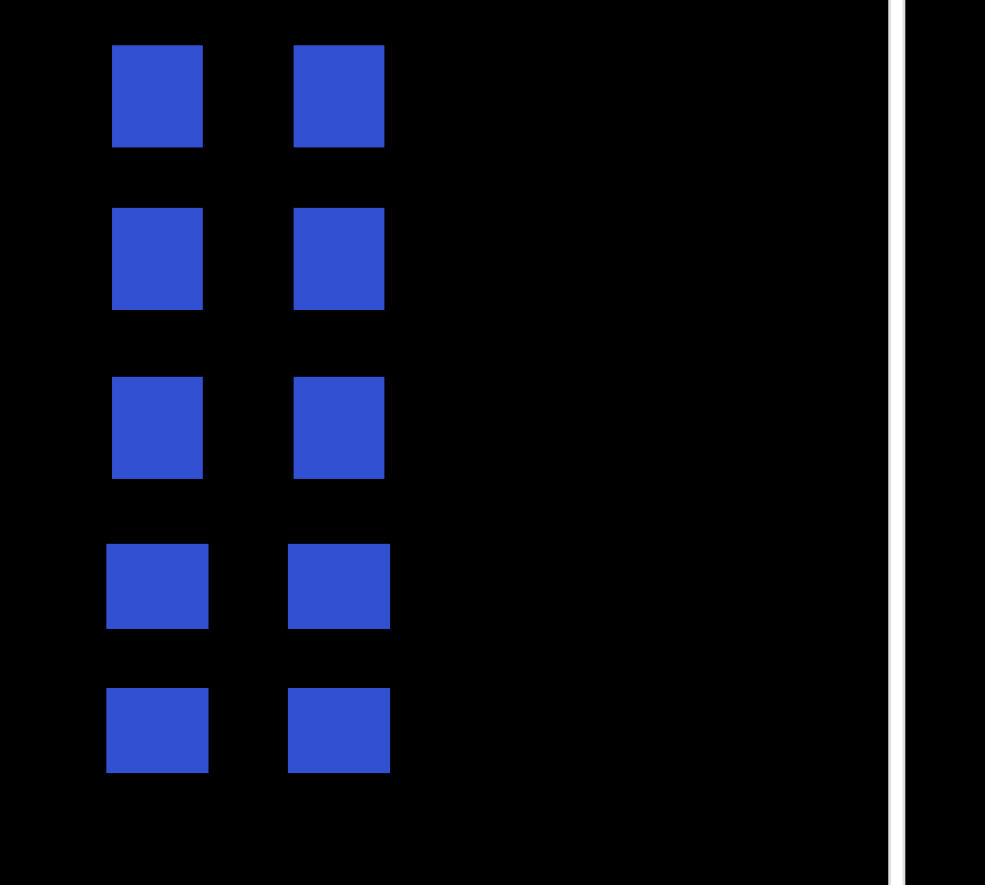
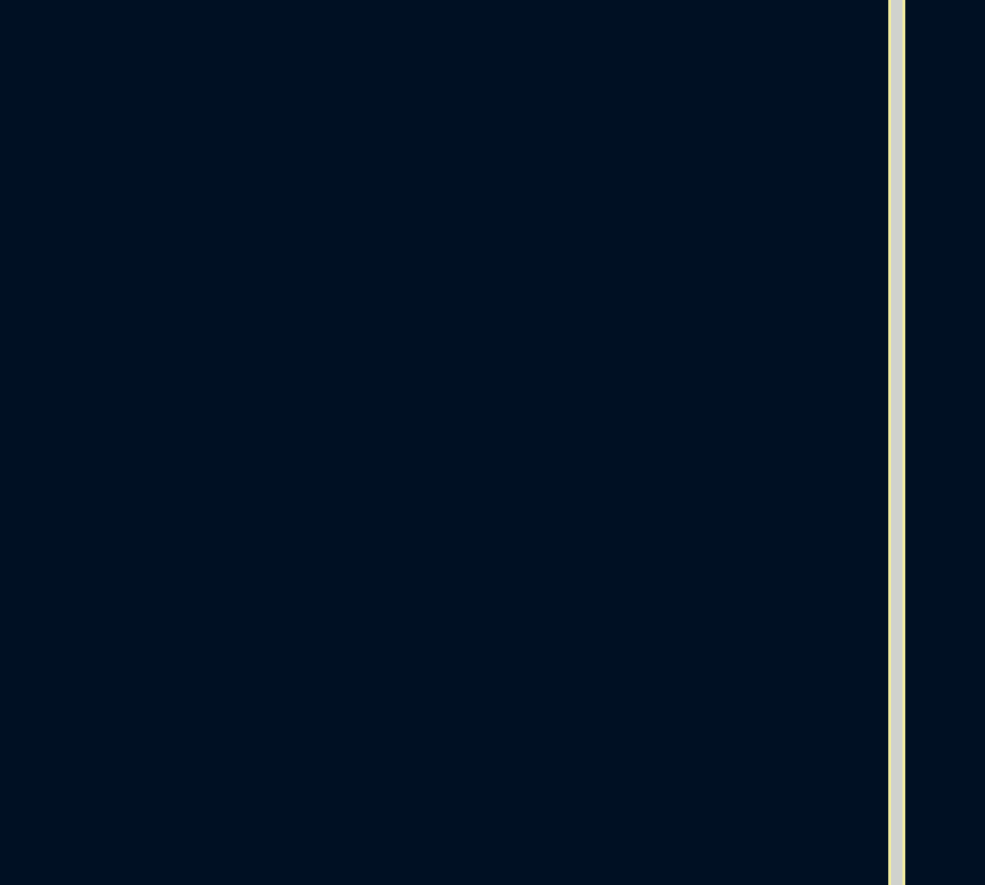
part: (248, 96) -> none
part: (248, 258) -> none
part: (248, 427) -> none
part: (248, 586) -> none
part: (248, 730) -> none

